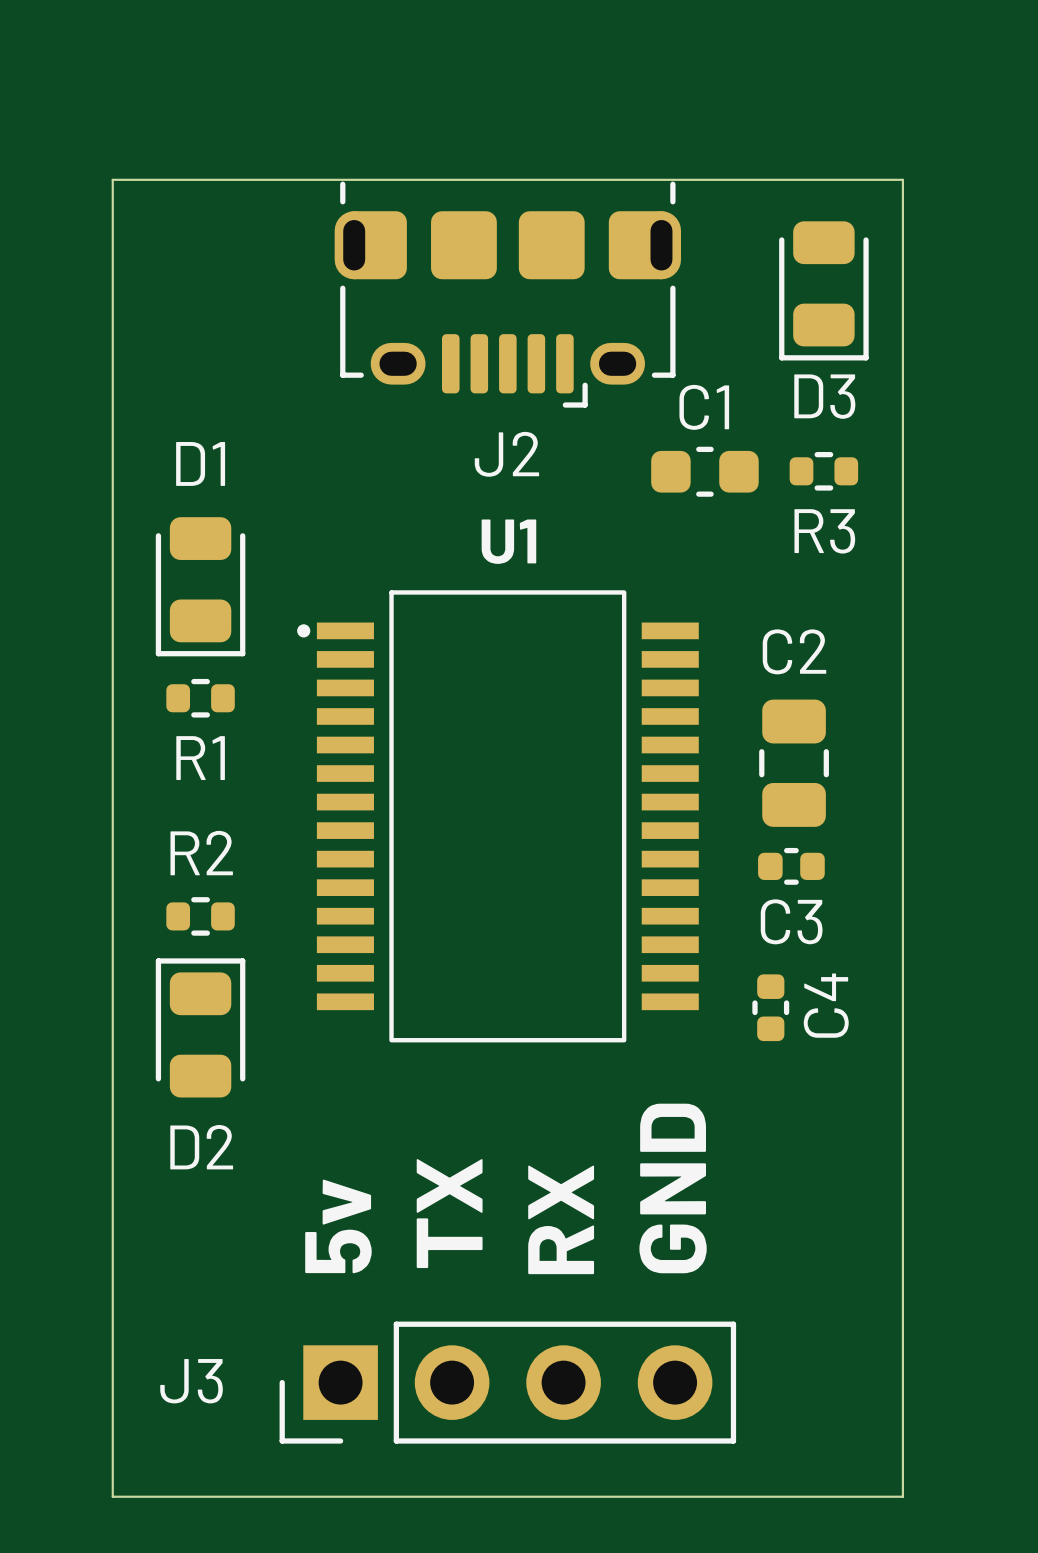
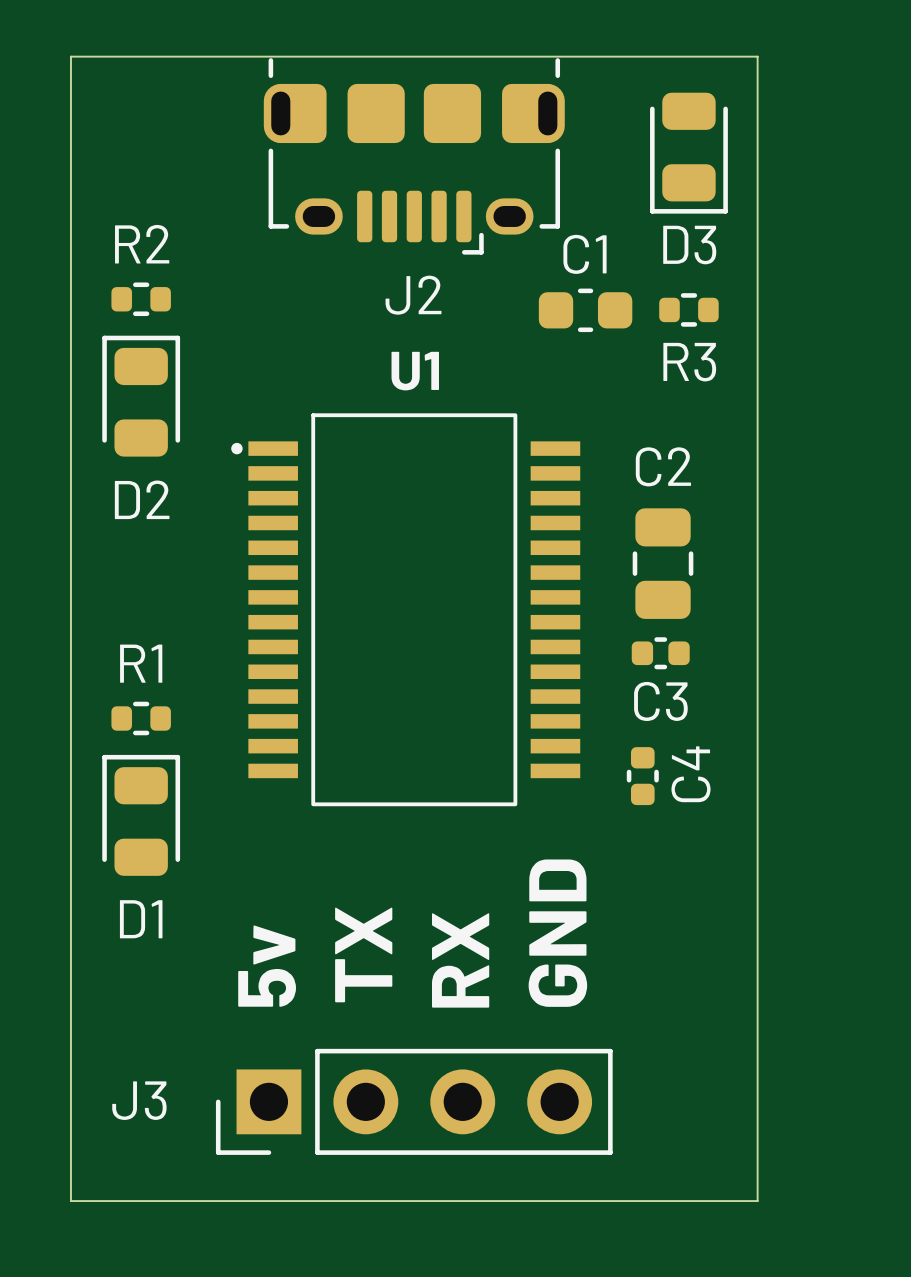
D1 rotation: 0° (200, 586) -> 180° (141, 815)
D1 position: (200, 586) -> (141, 815)
R1 position: (200, 698) -> (141, 718)
R1 name position: R1 (200, 758) -> R1 (141, 663)
R2 position: (200, 916) -> (141, 299)
D2 position: (200, 1027) -> (141, 396)

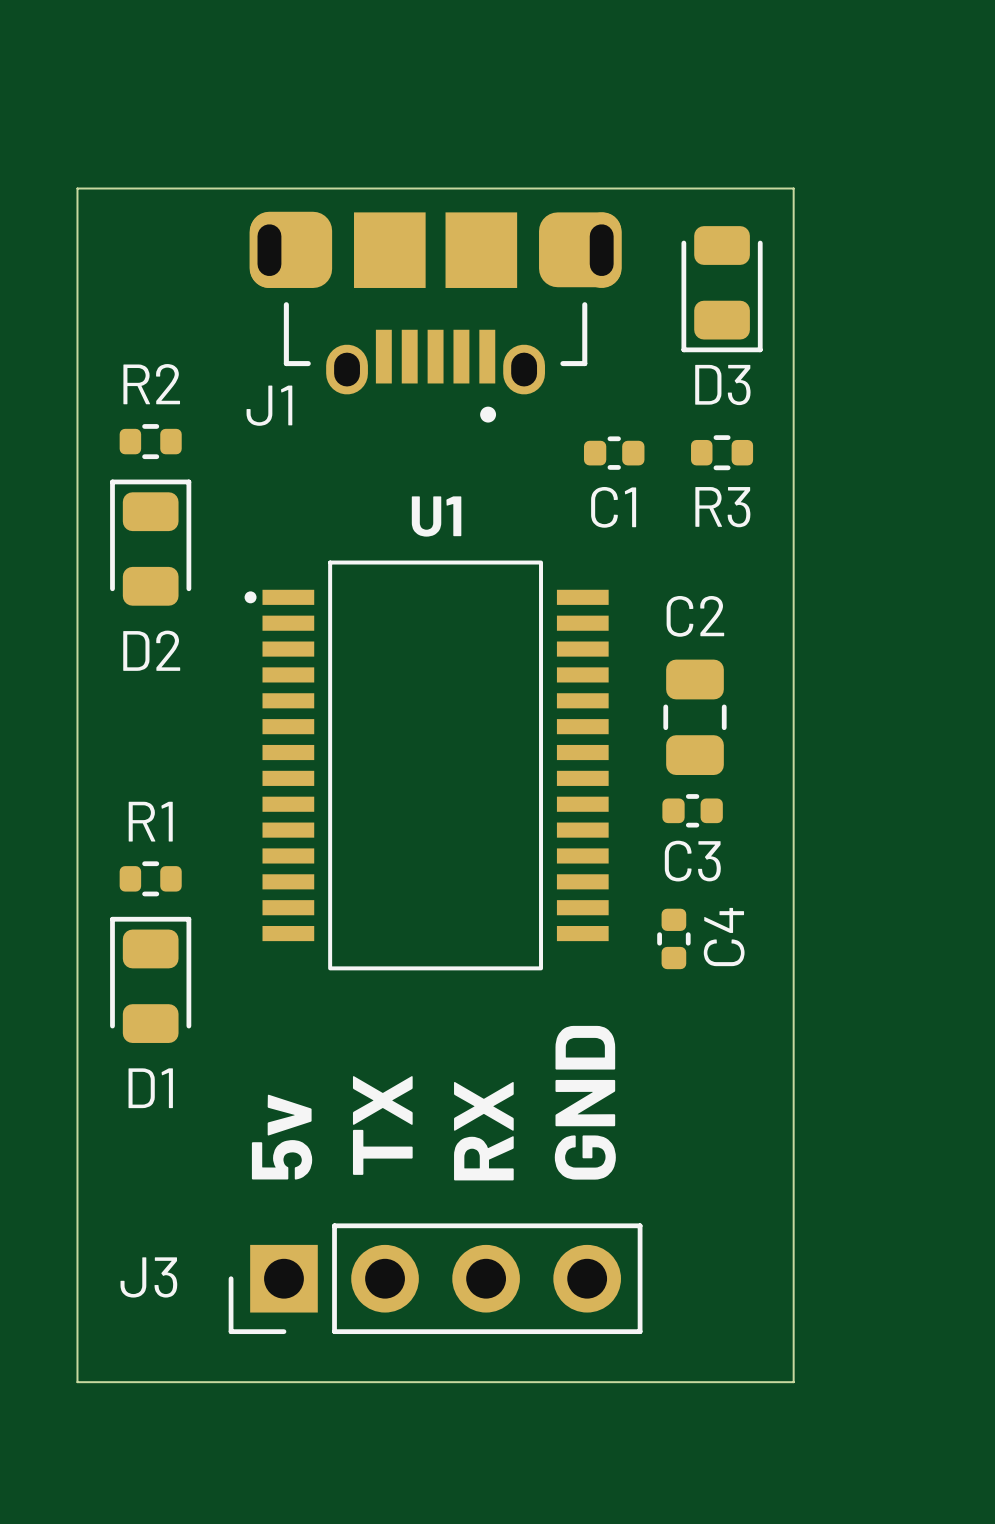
J2: (414, 156) -> none
J1: none -> (435, 317)
C1 name position: C1 (585, 254) -> C1 (613, 507)
C1 footprint: [538, 288, 633, 333] -> [583, 436, 645, 470]

